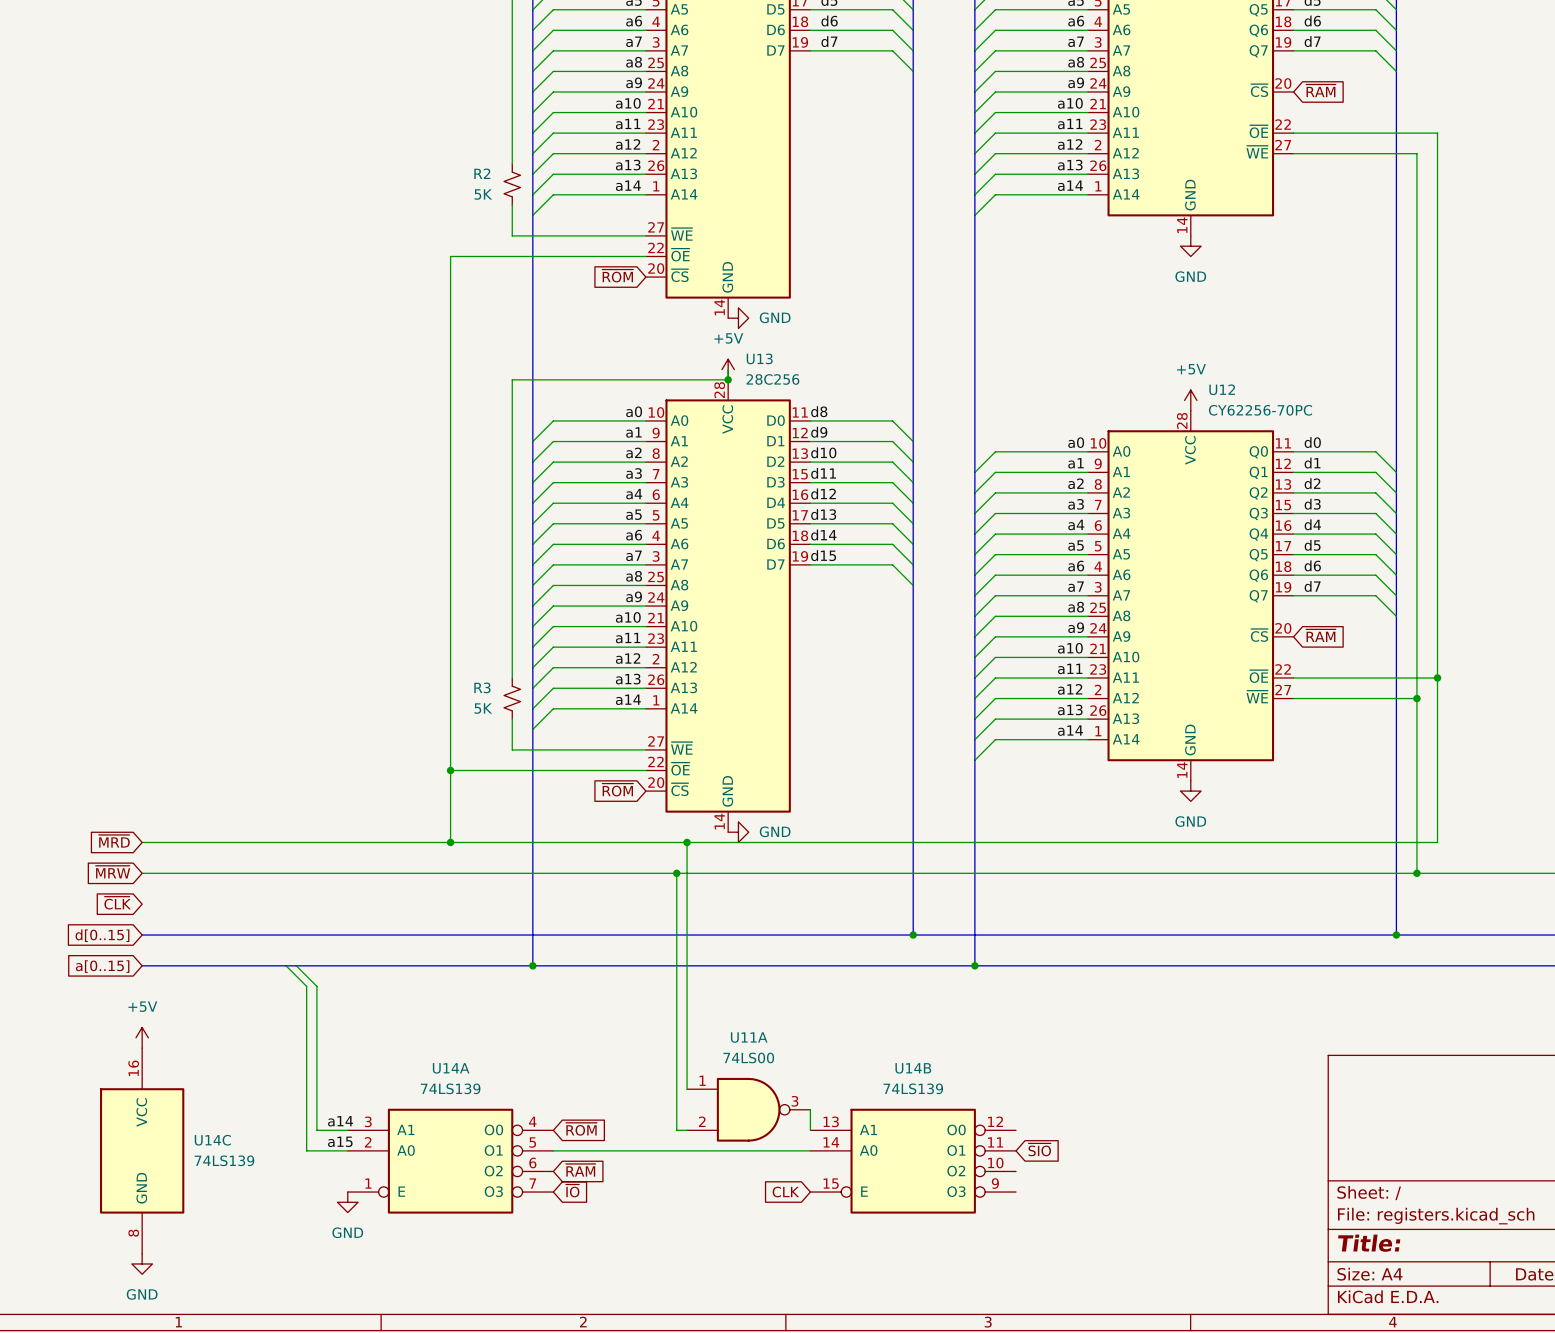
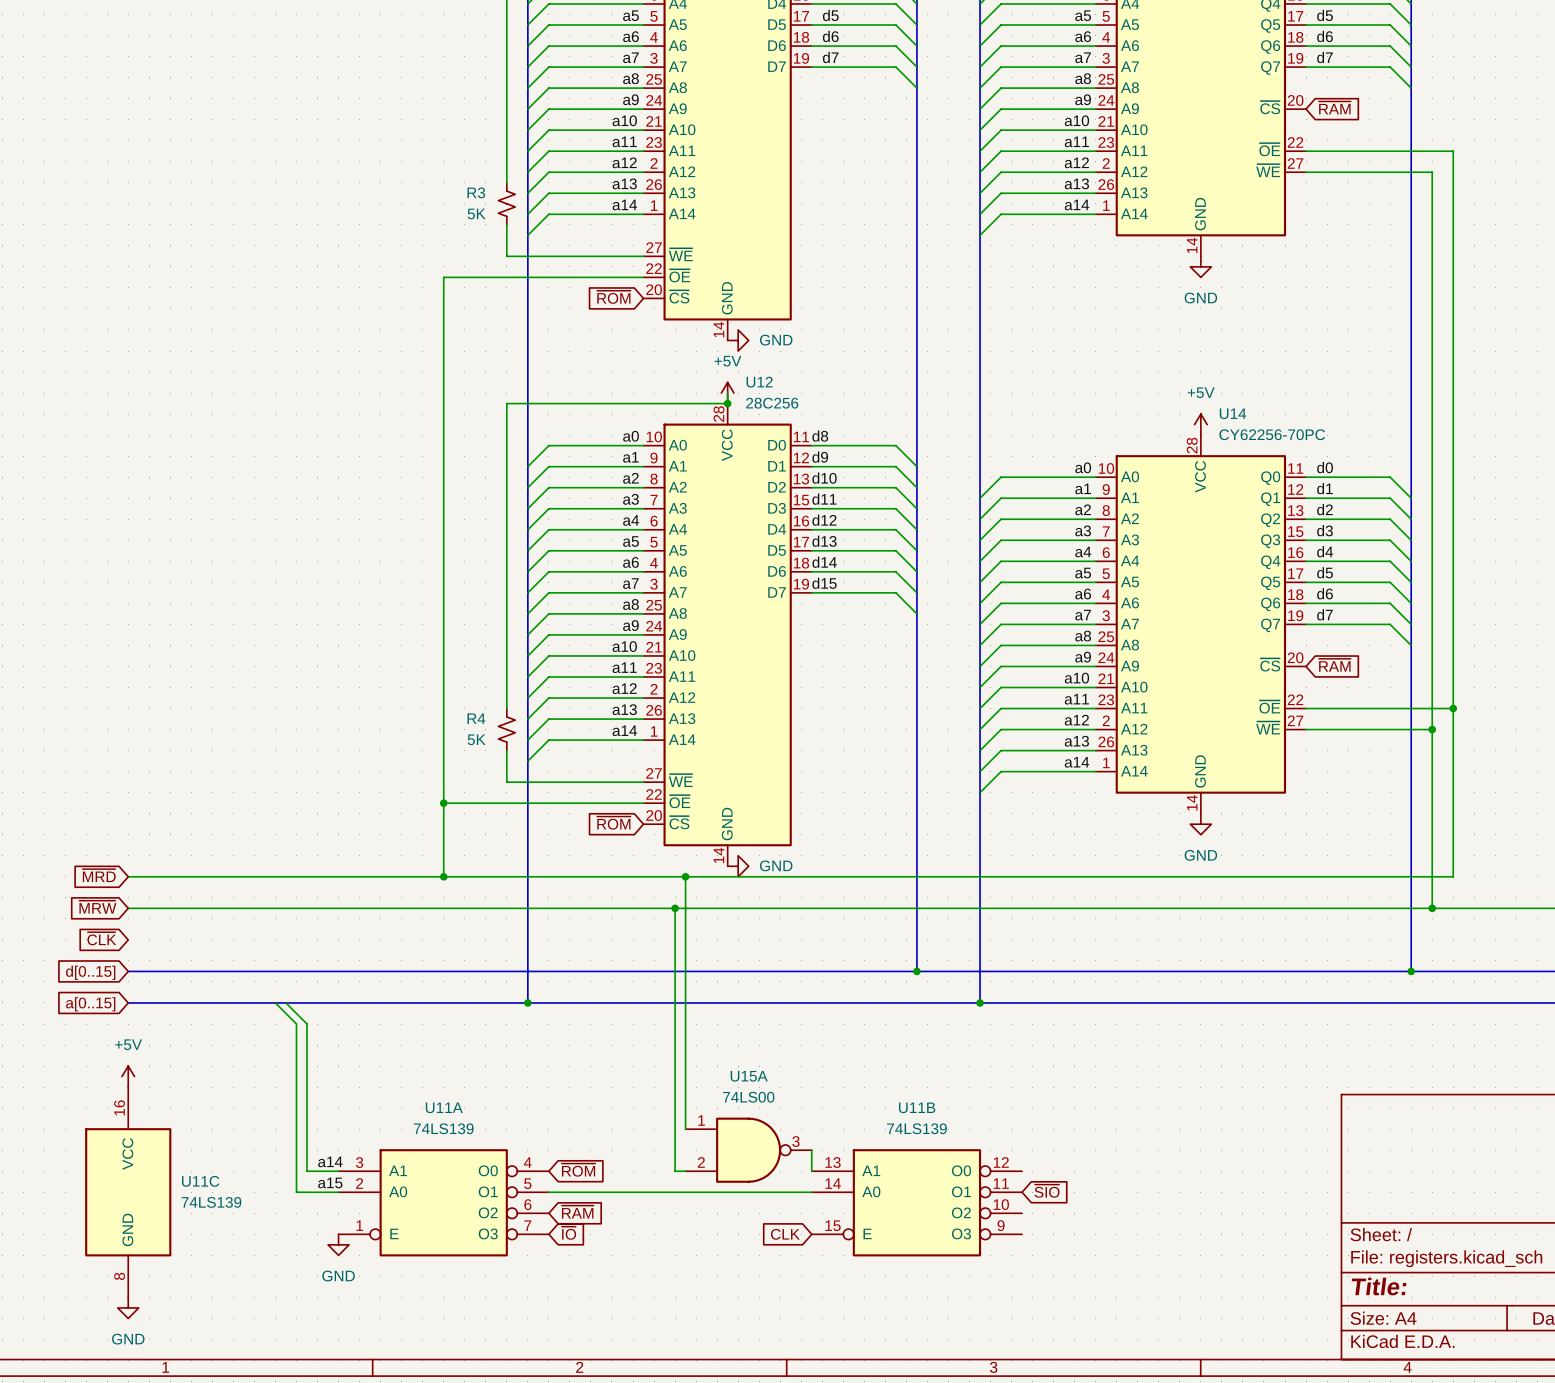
R2 name: R2 (482, 173) -> R3 (476, 192)
U13 name: U13 (759, 358) -> U12 (759, 382)
U12 name: U12 (1222, 389) -> U14 (1233, 413)
R3 name: R3 (482, 687) -> R4 (476, 718)
U11A name: U11A (749, 1037) -> U15A (749, 1076)
U14A name: U14A (451, 1068) -> U11A (444, 1107)
U14B name: U14B (913, 1068) -> U11B (917, 1107)
U14C name: U14C (212, 1140) -> U11C (200, 1181)

